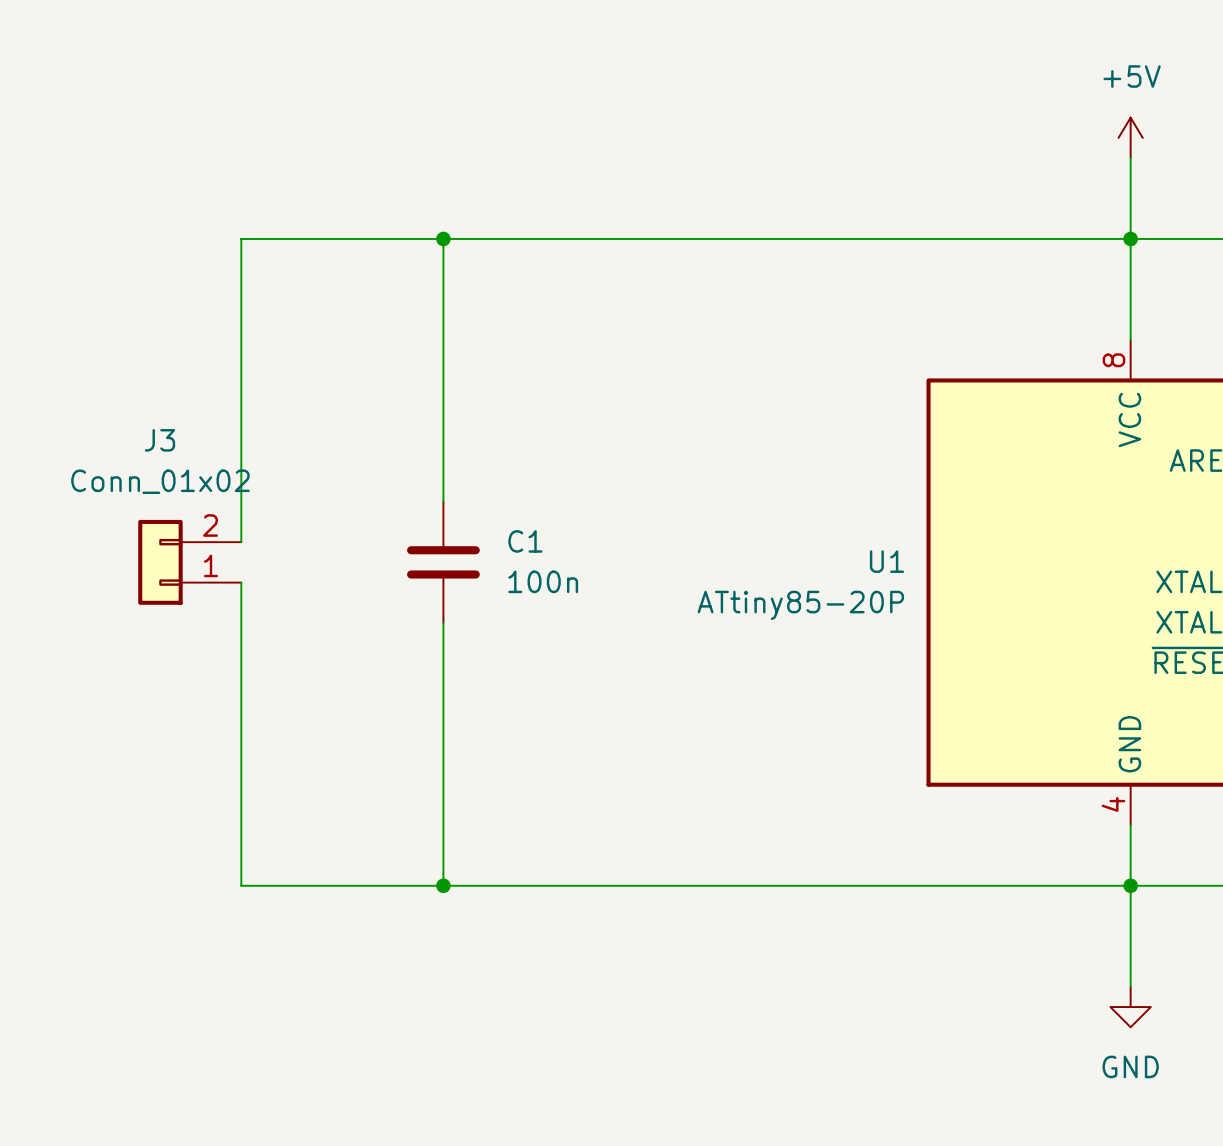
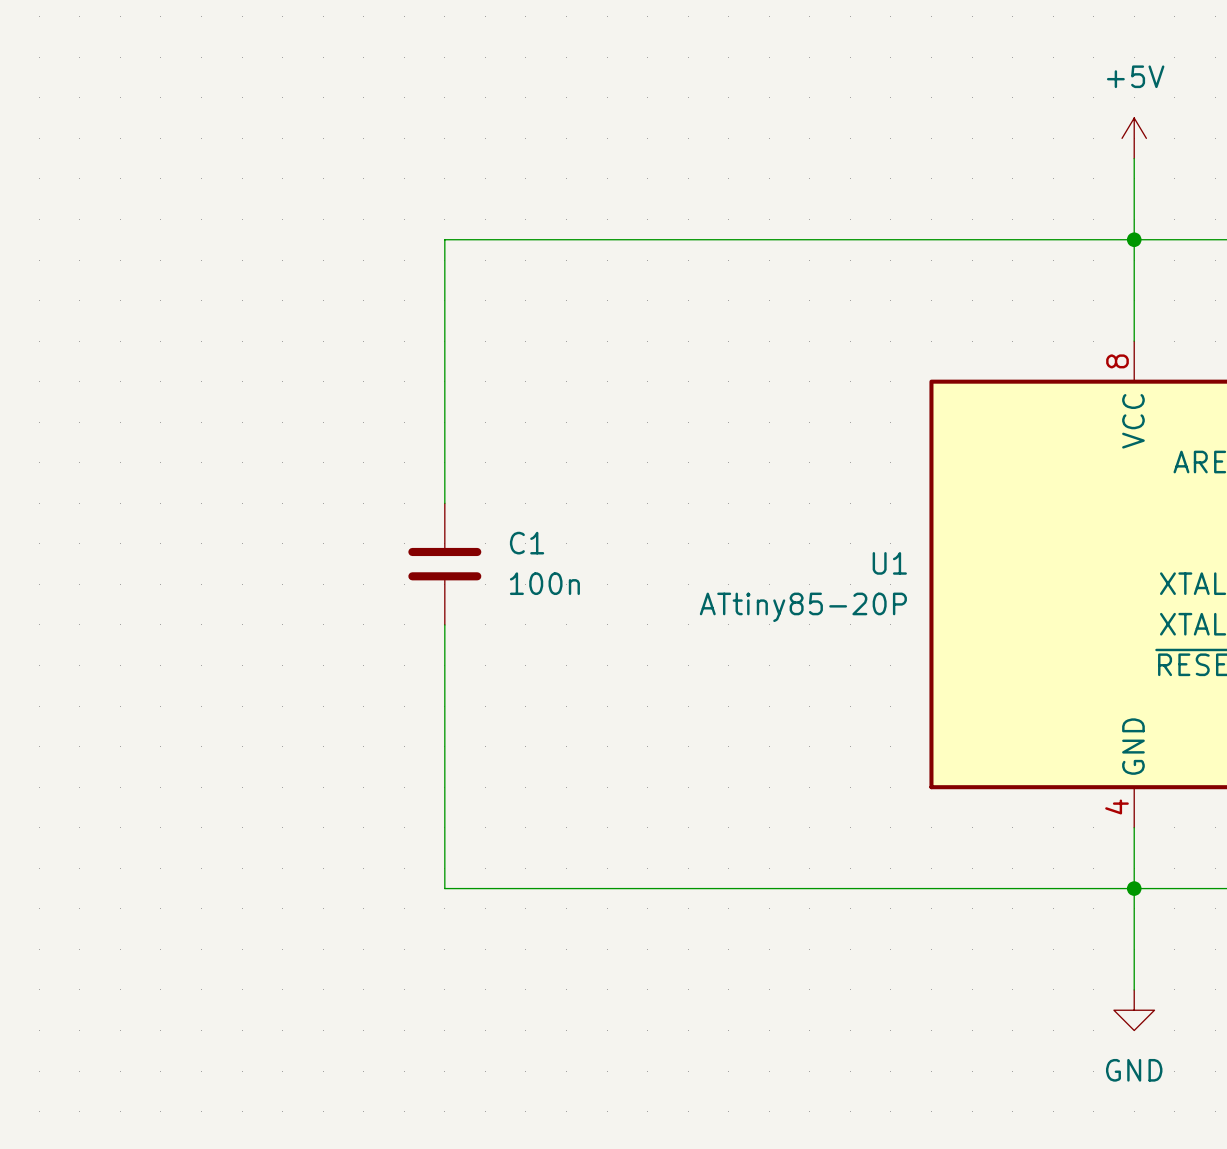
wire: (443, 238) (241, 238) (241, 542) -> none
junction: (443, 238) -> none
J3: Conn_01x02 (189, 562) -> none
wire: (241, 582) (241, 885) (443, 885) -> none
junction: (443, 885) -> none

